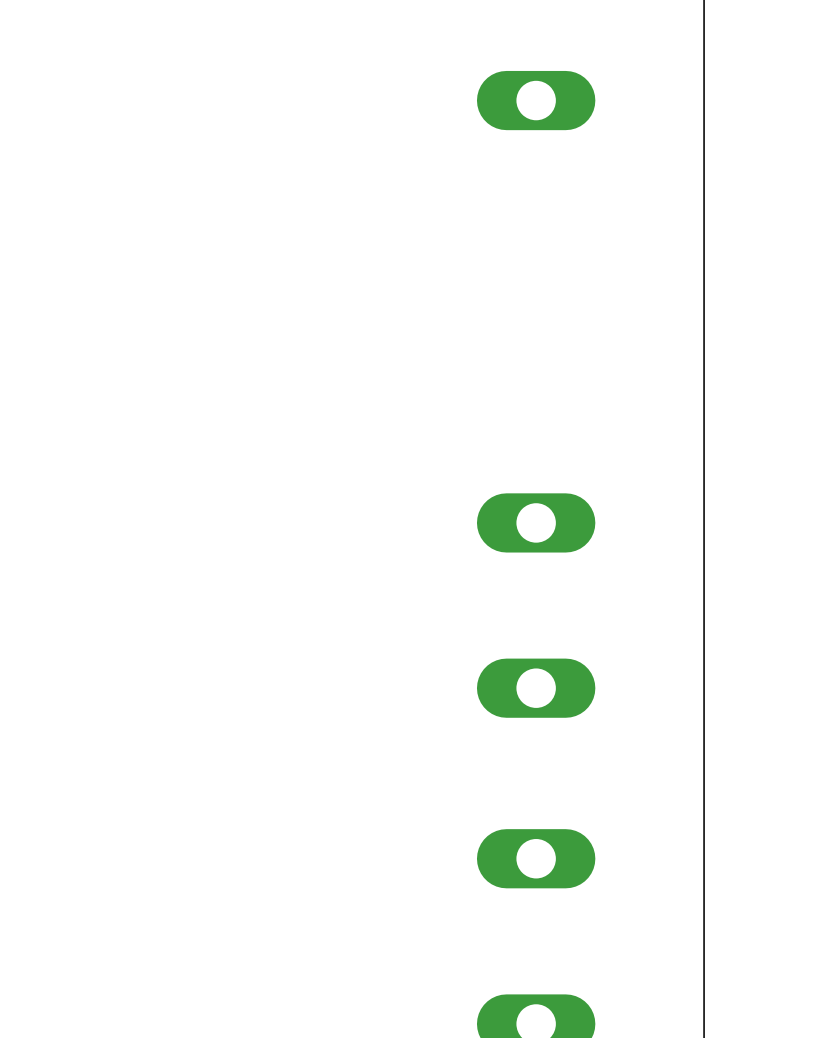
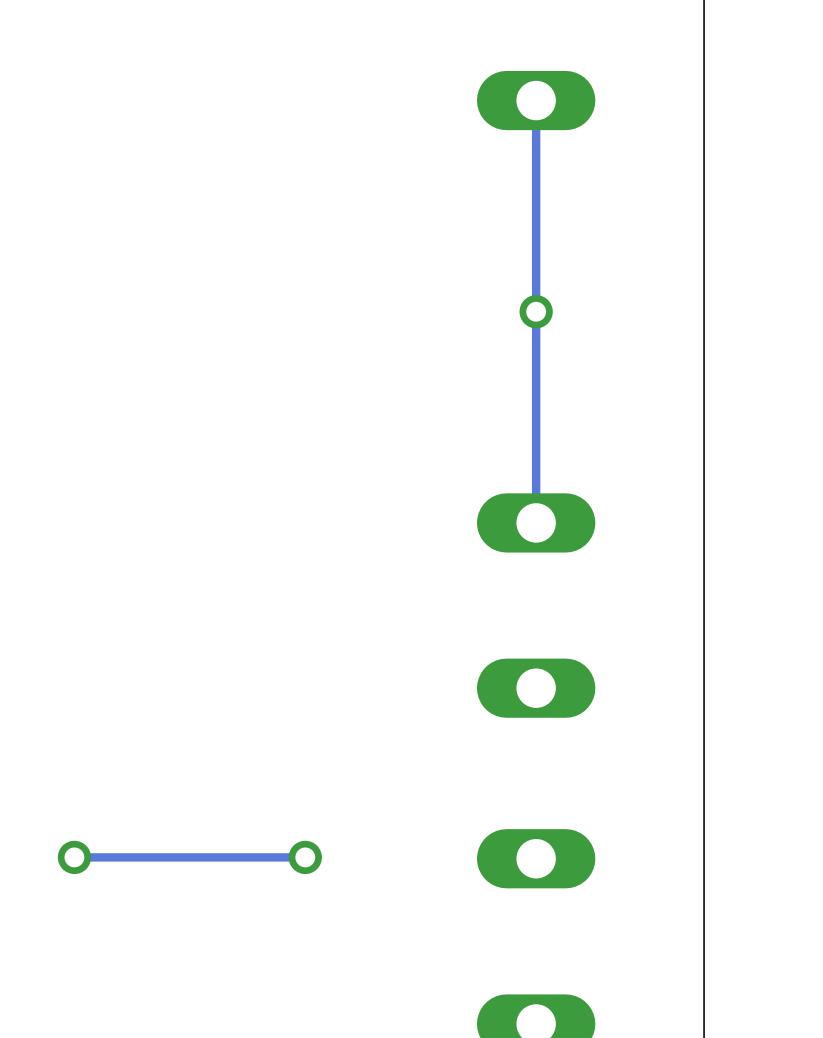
track: none -> (536, 100) (536, 522)
via: none -> (536, 311)
via: none -> (74, 857)
track: none -> (305, 857) (74, 857)
via: none -> (305, 857)

